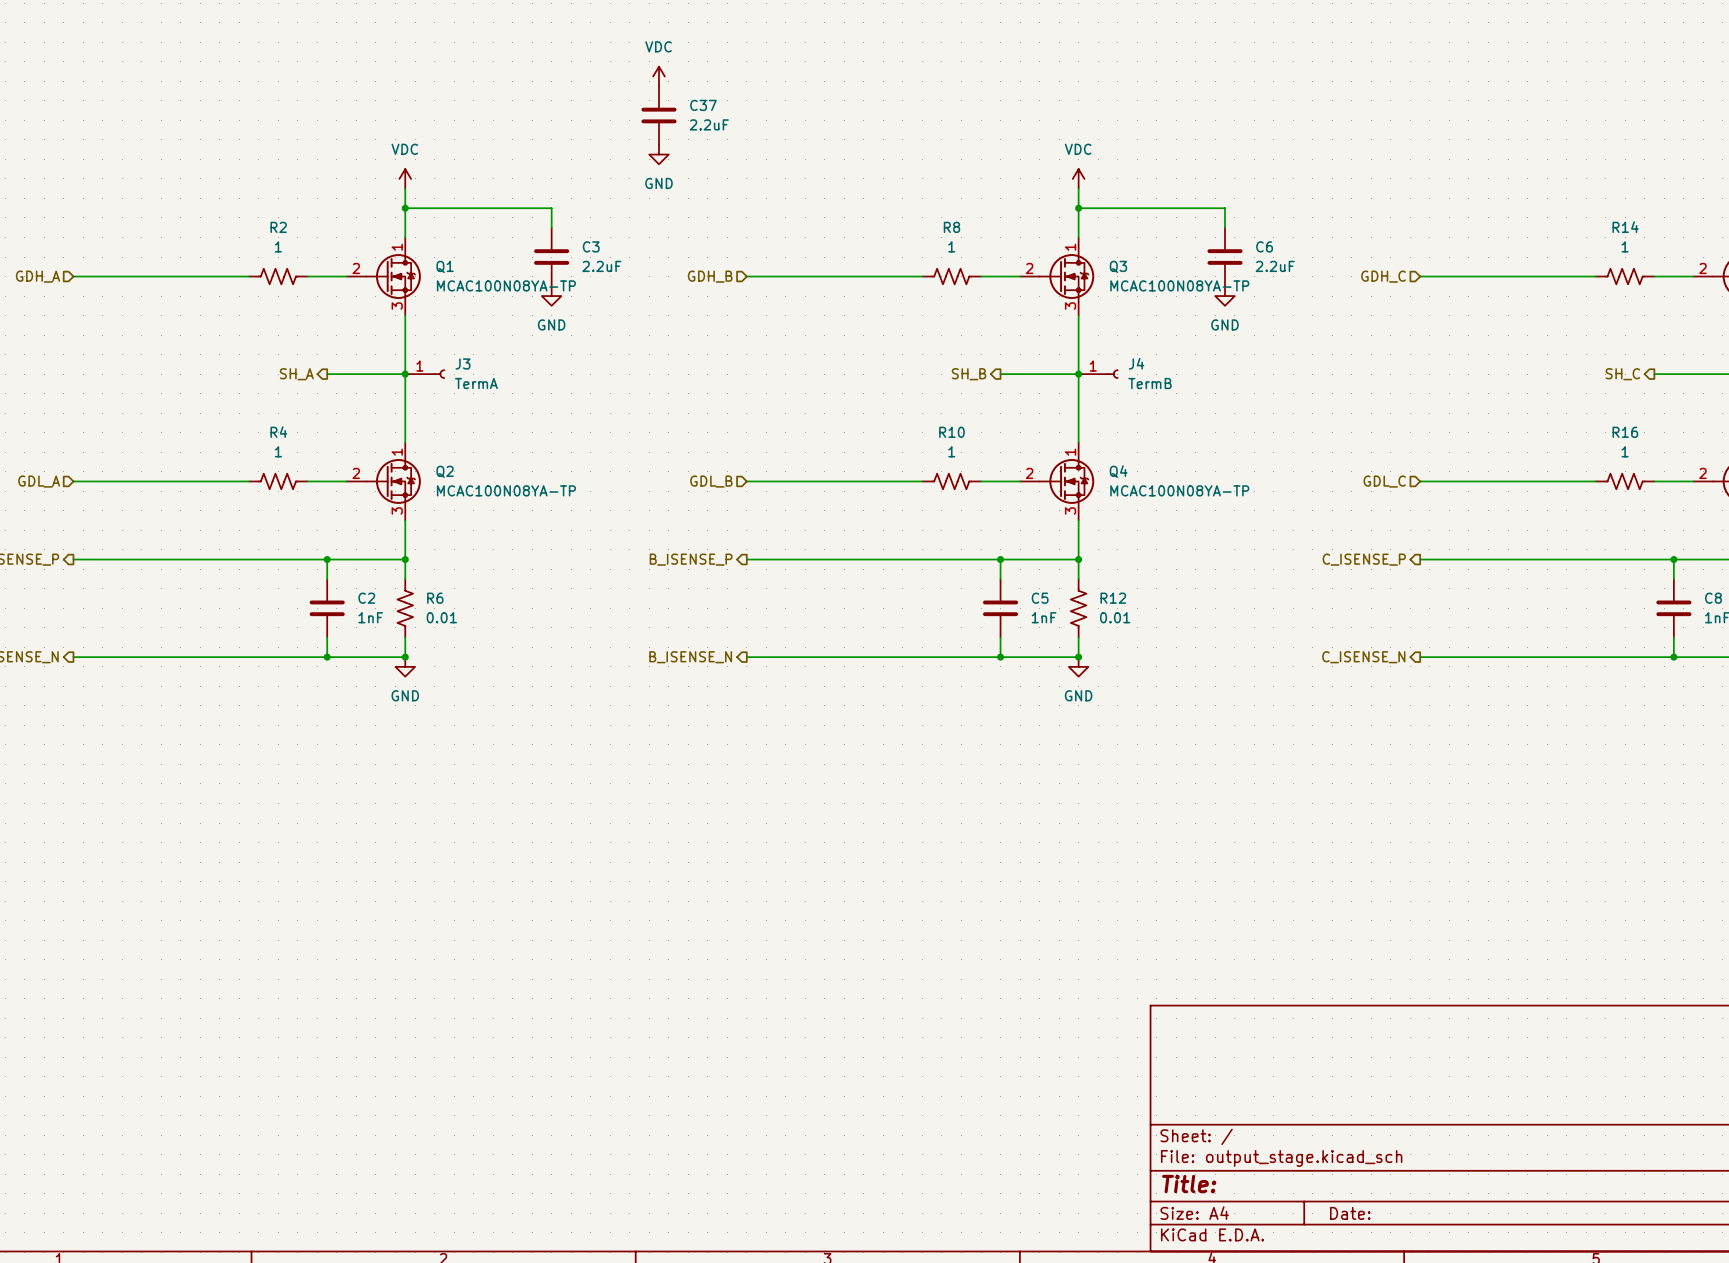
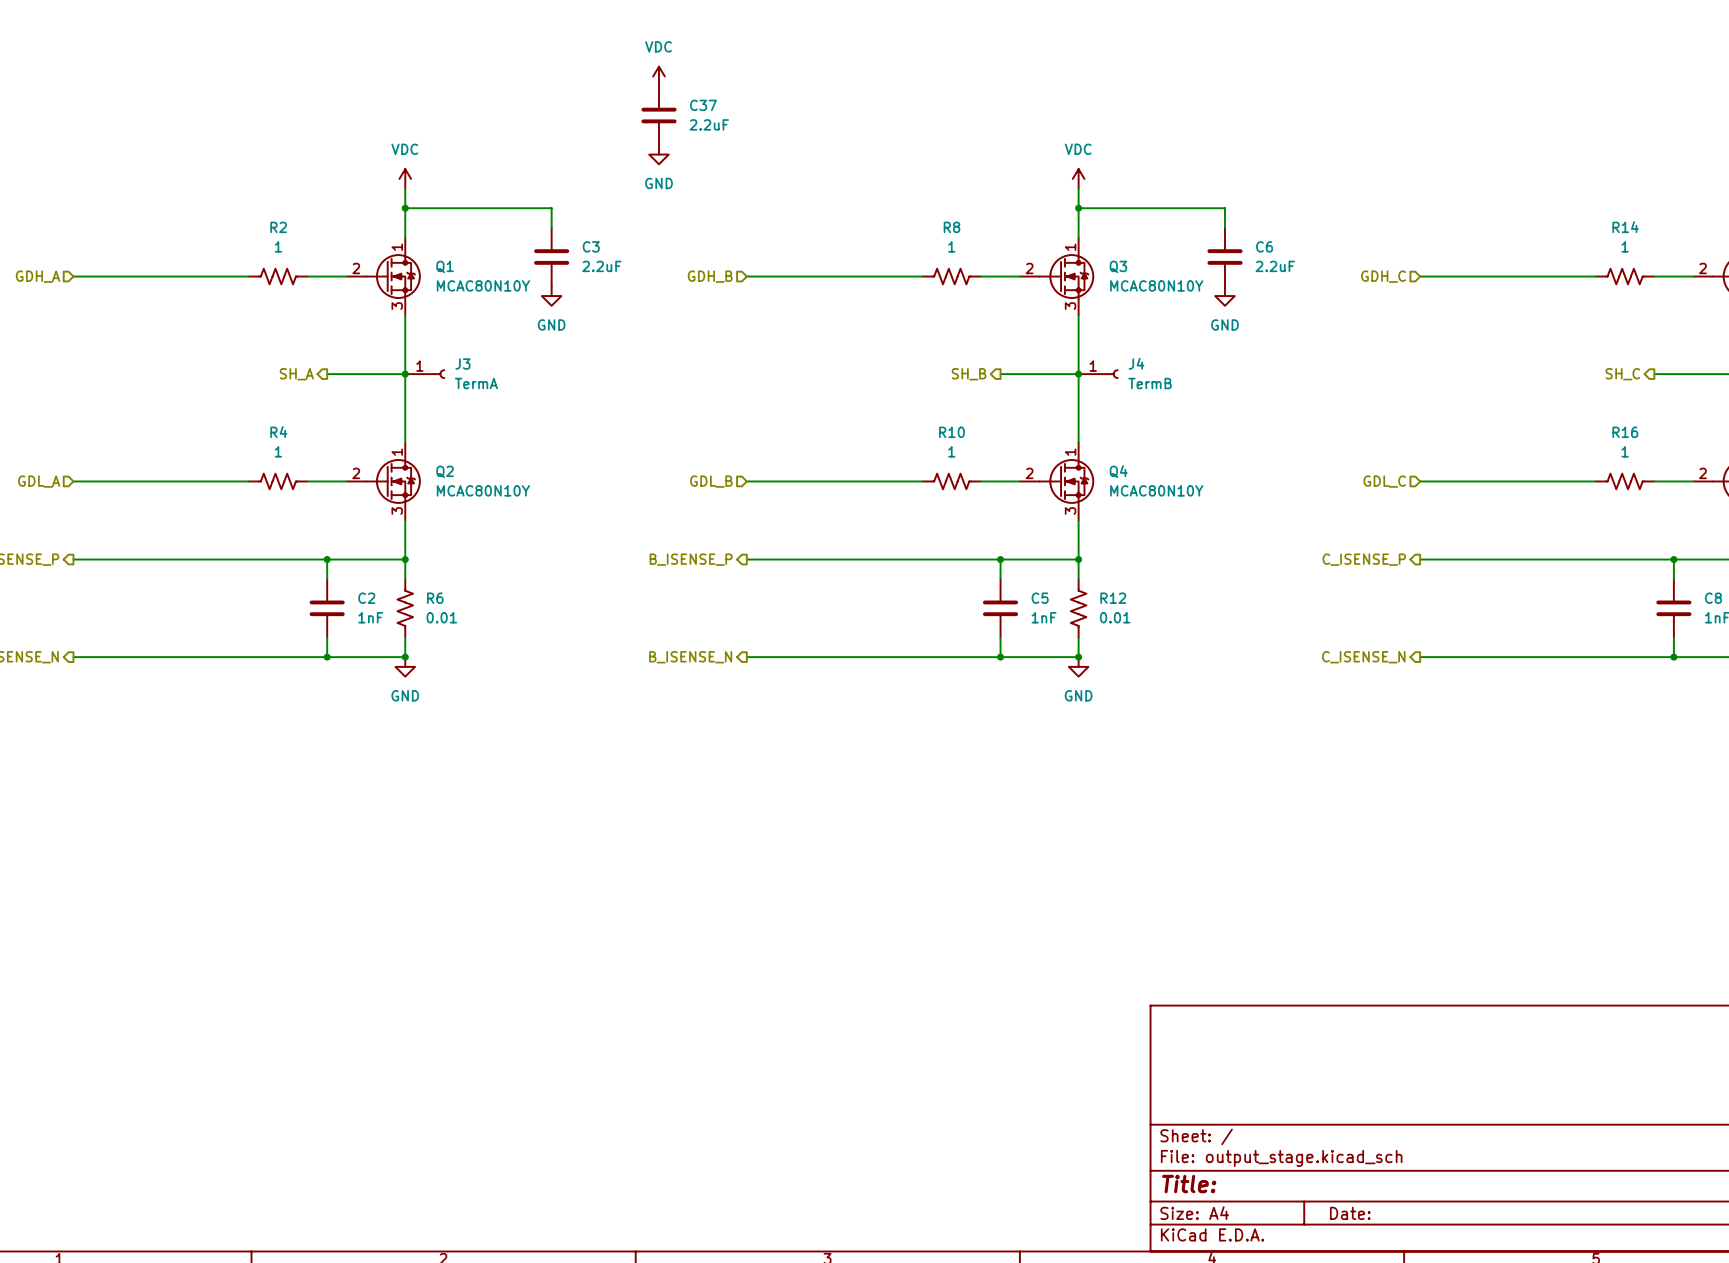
Q1 value: MCAC100N08YA-TP (506, 285) -> MCAC80N10Y (483, 285)
Q3 value: MCAC100N08YA-TP (1179, 285) -> MCAC80N10Y (1156, 285)
Q2 value: MCAC100N08YA-TP (506, 490) -> MCAC80N10Y (483, 490)
Q4 value: MCAC100N08YA-TP (1179, 490) -> MCAC80N10Y (1156, 490)

